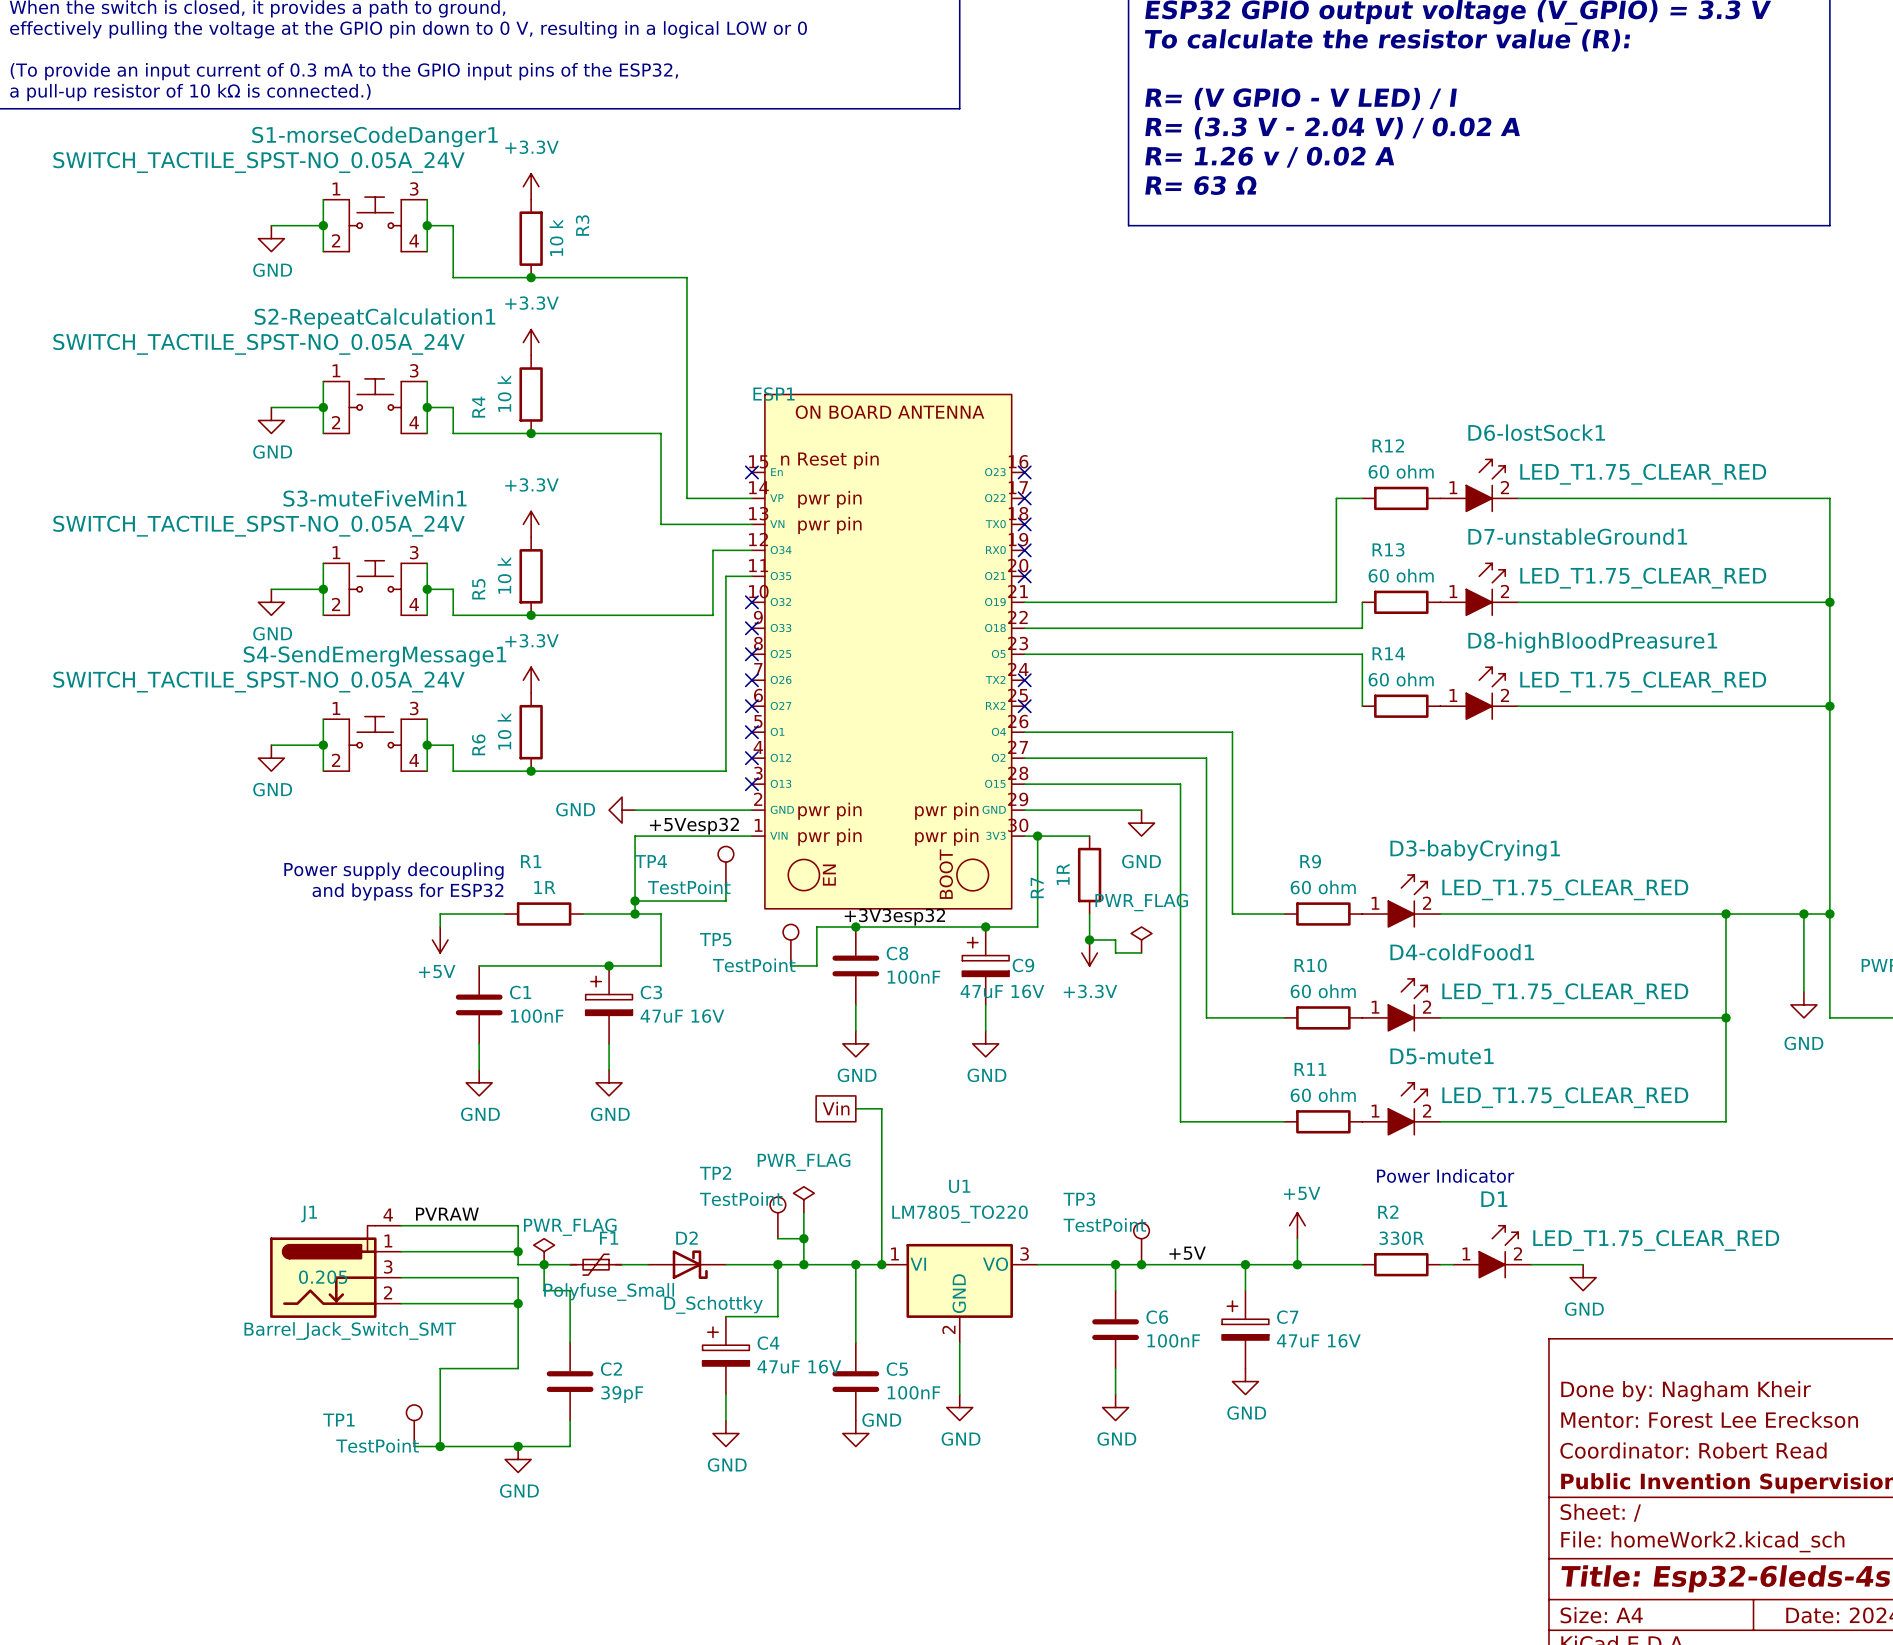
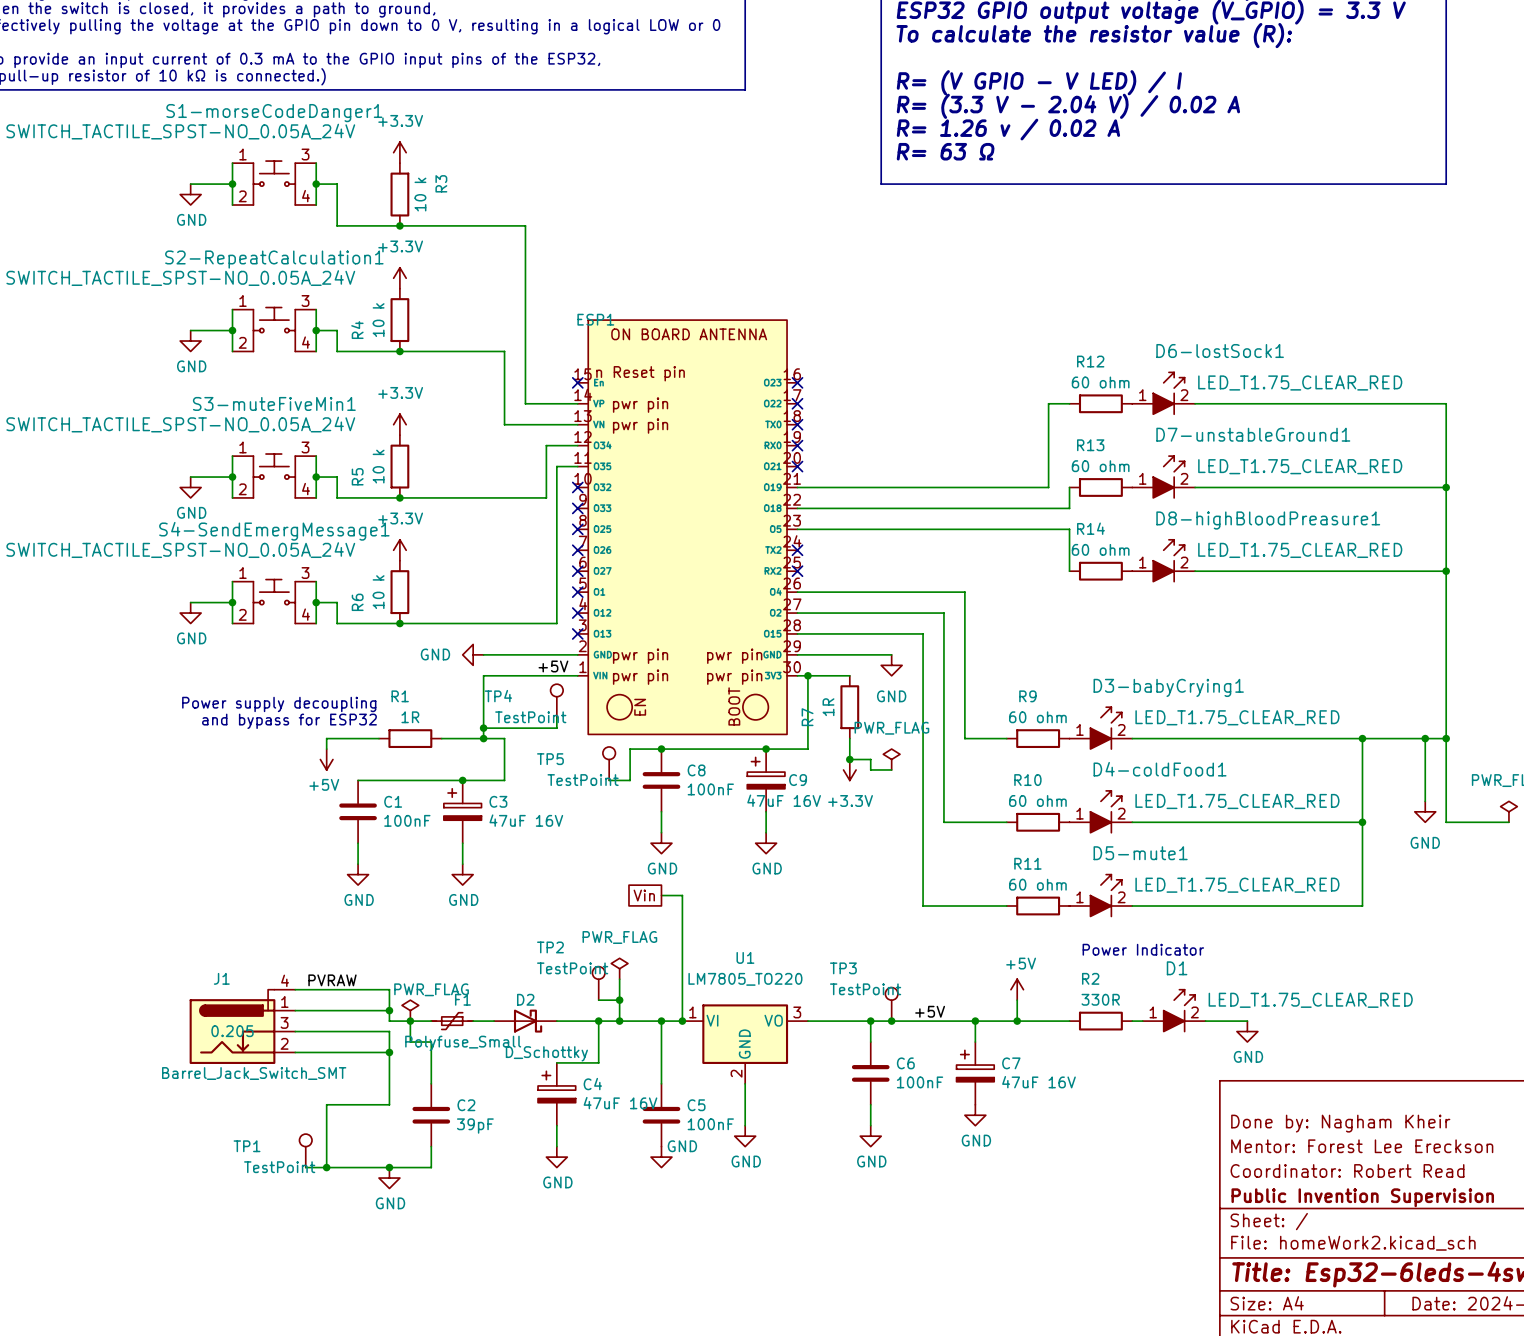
label: none -> +5V (553, 666)
label: +5Vesp32 (694, 826) -> none
label: +3V3esp32 (894, 917) -> none

